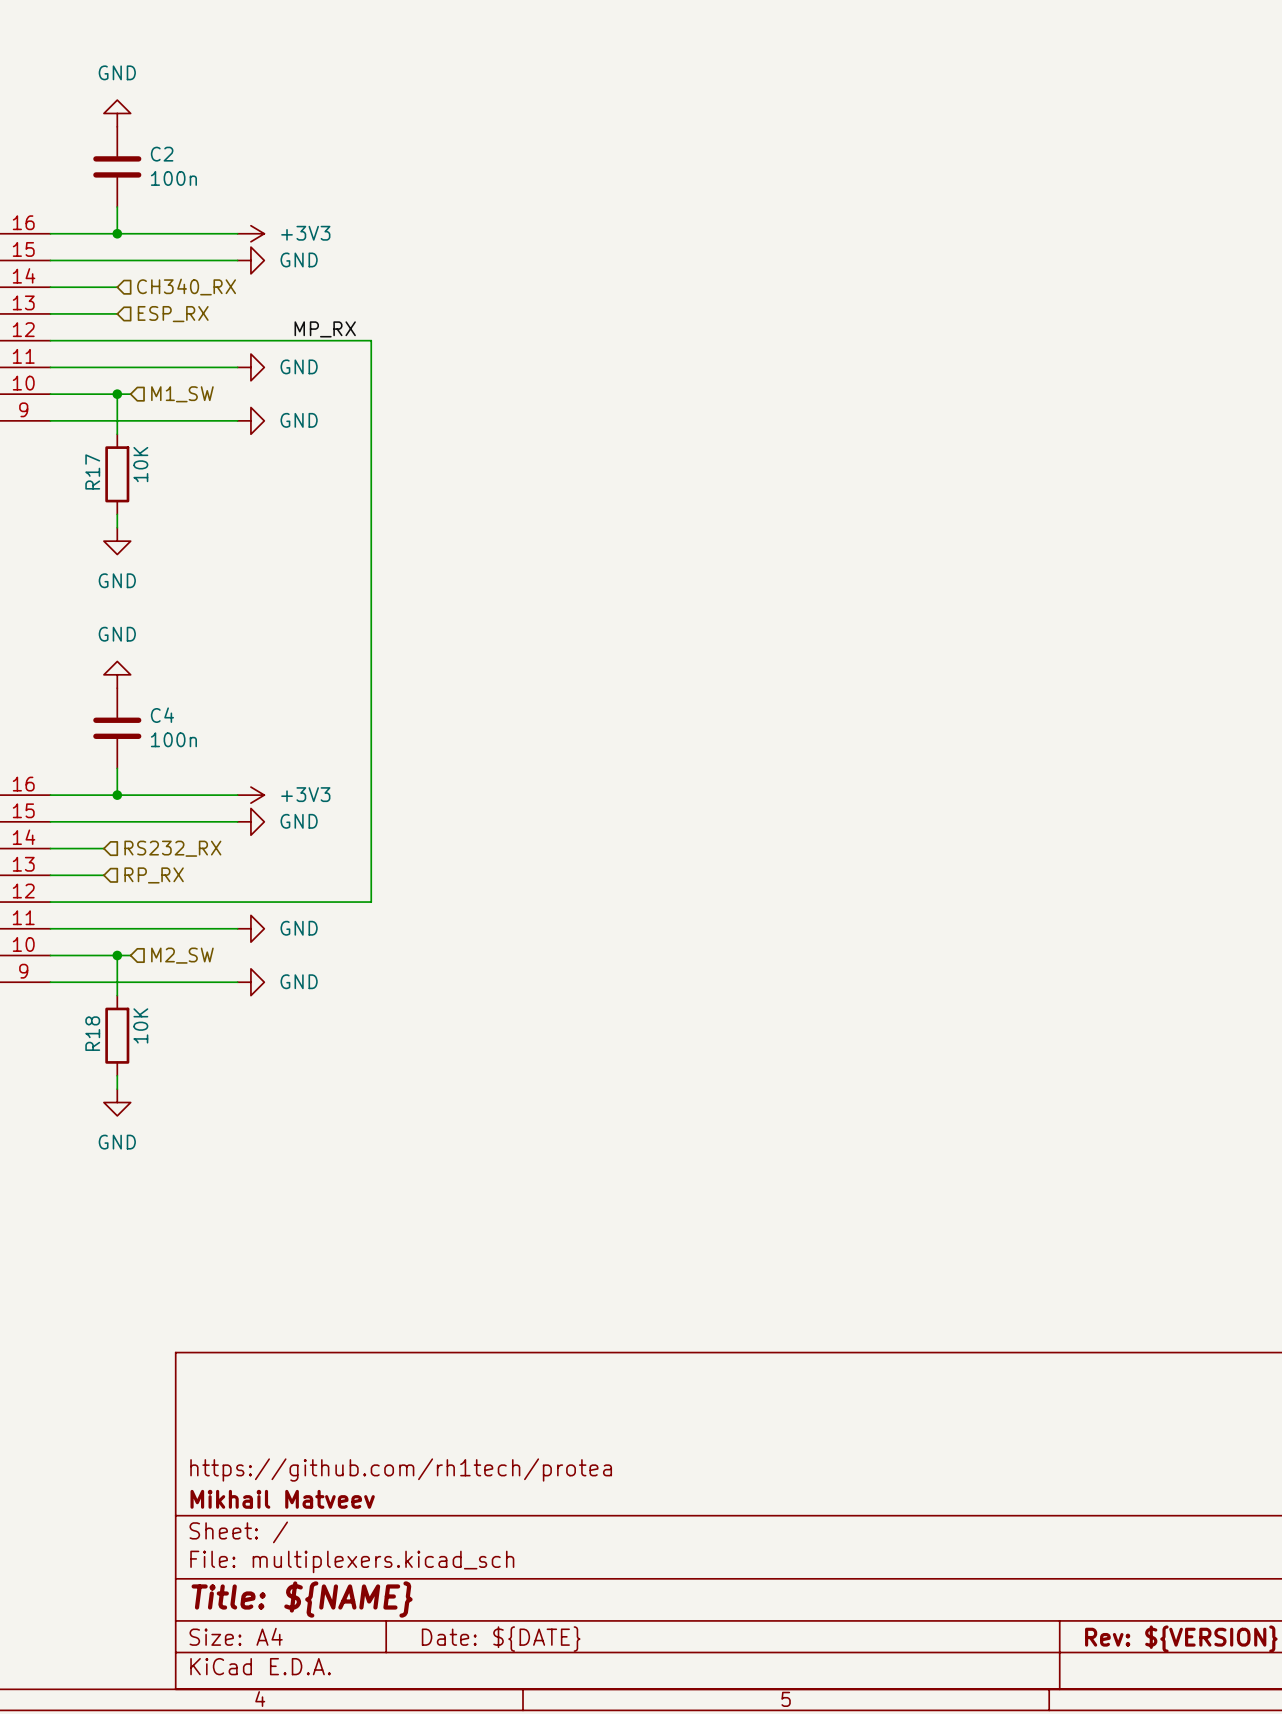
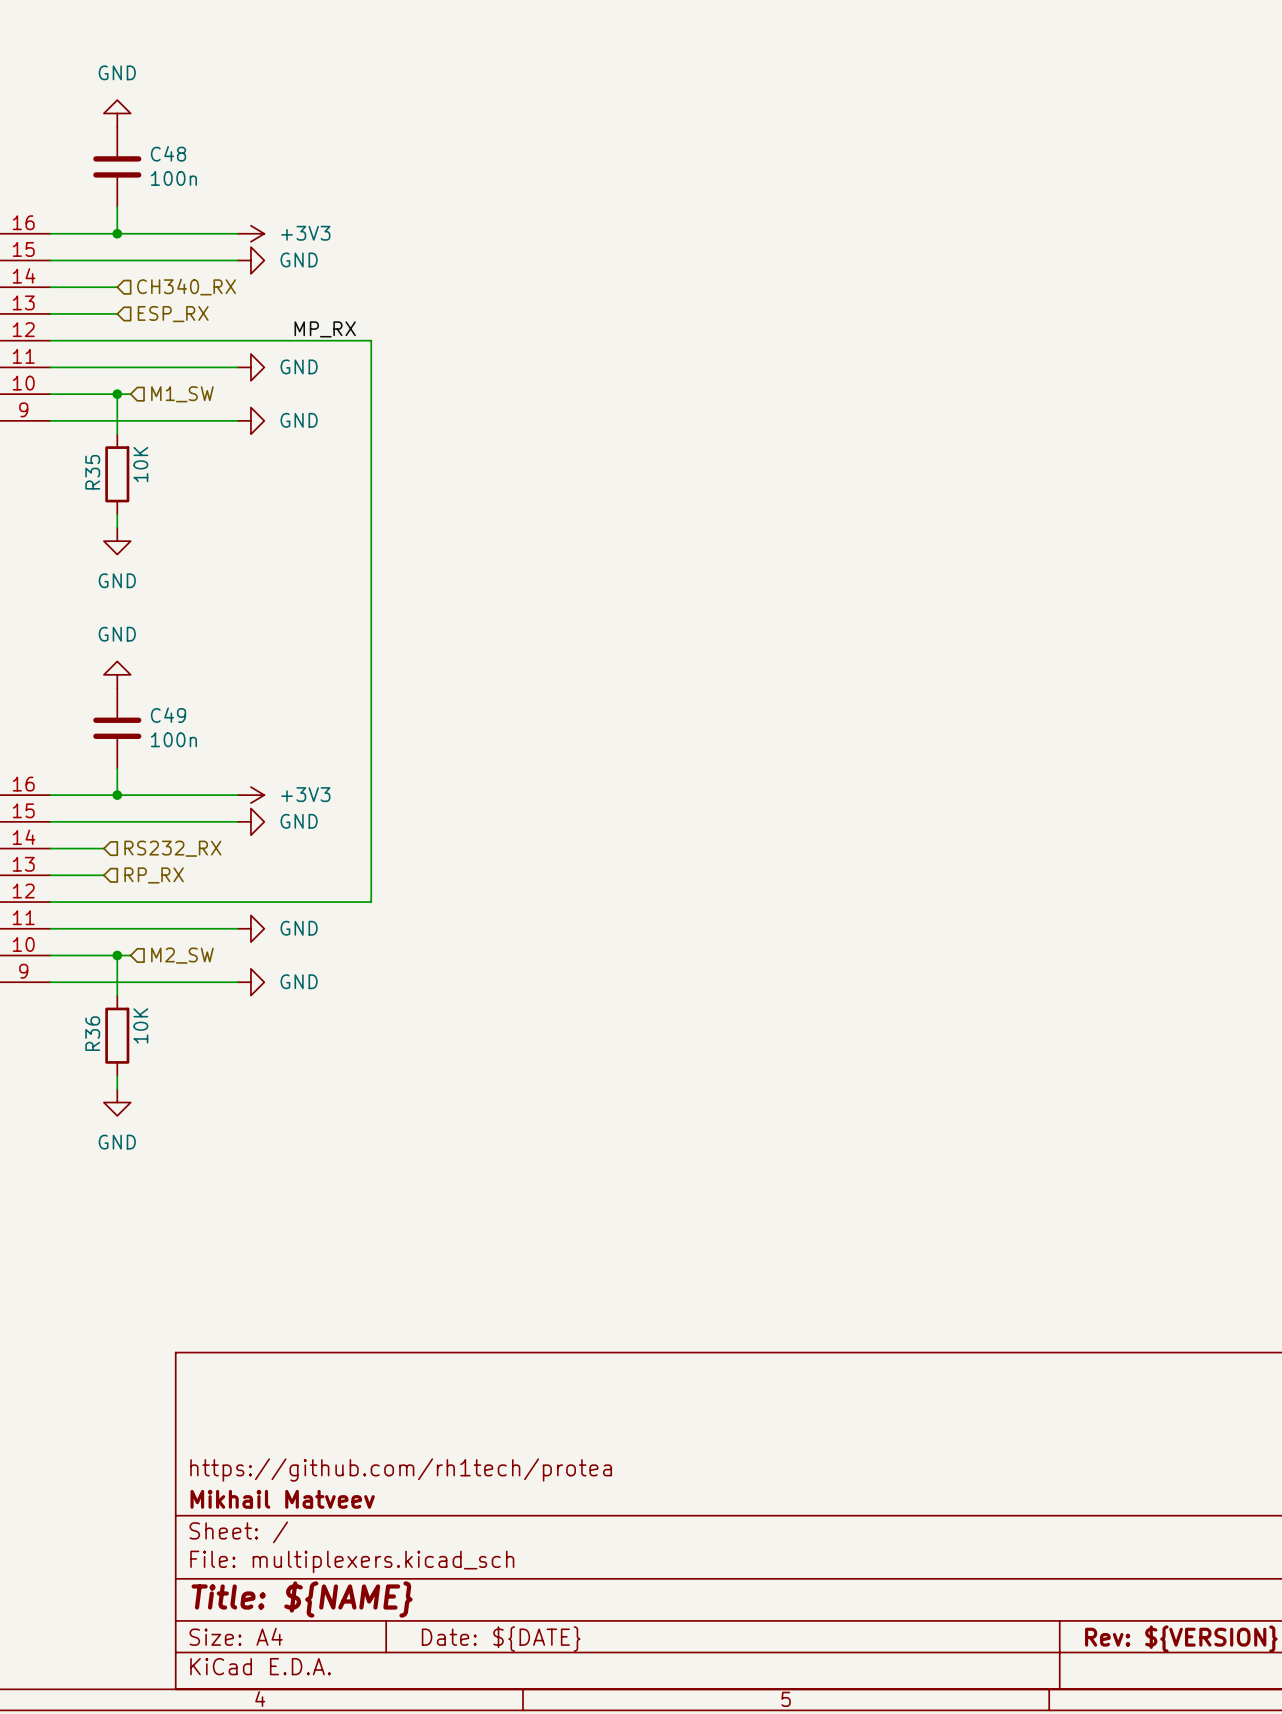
C2 name: C2 (162, 154) -> C48 (168, 153)
R17 name: R17 (92, 471) -> R35 (92, 472)
C4 name: C4 (162, 715) -> C49 (168, 715)
R18 name: R18 (92, 1033) -> R36 (92, 1033)

